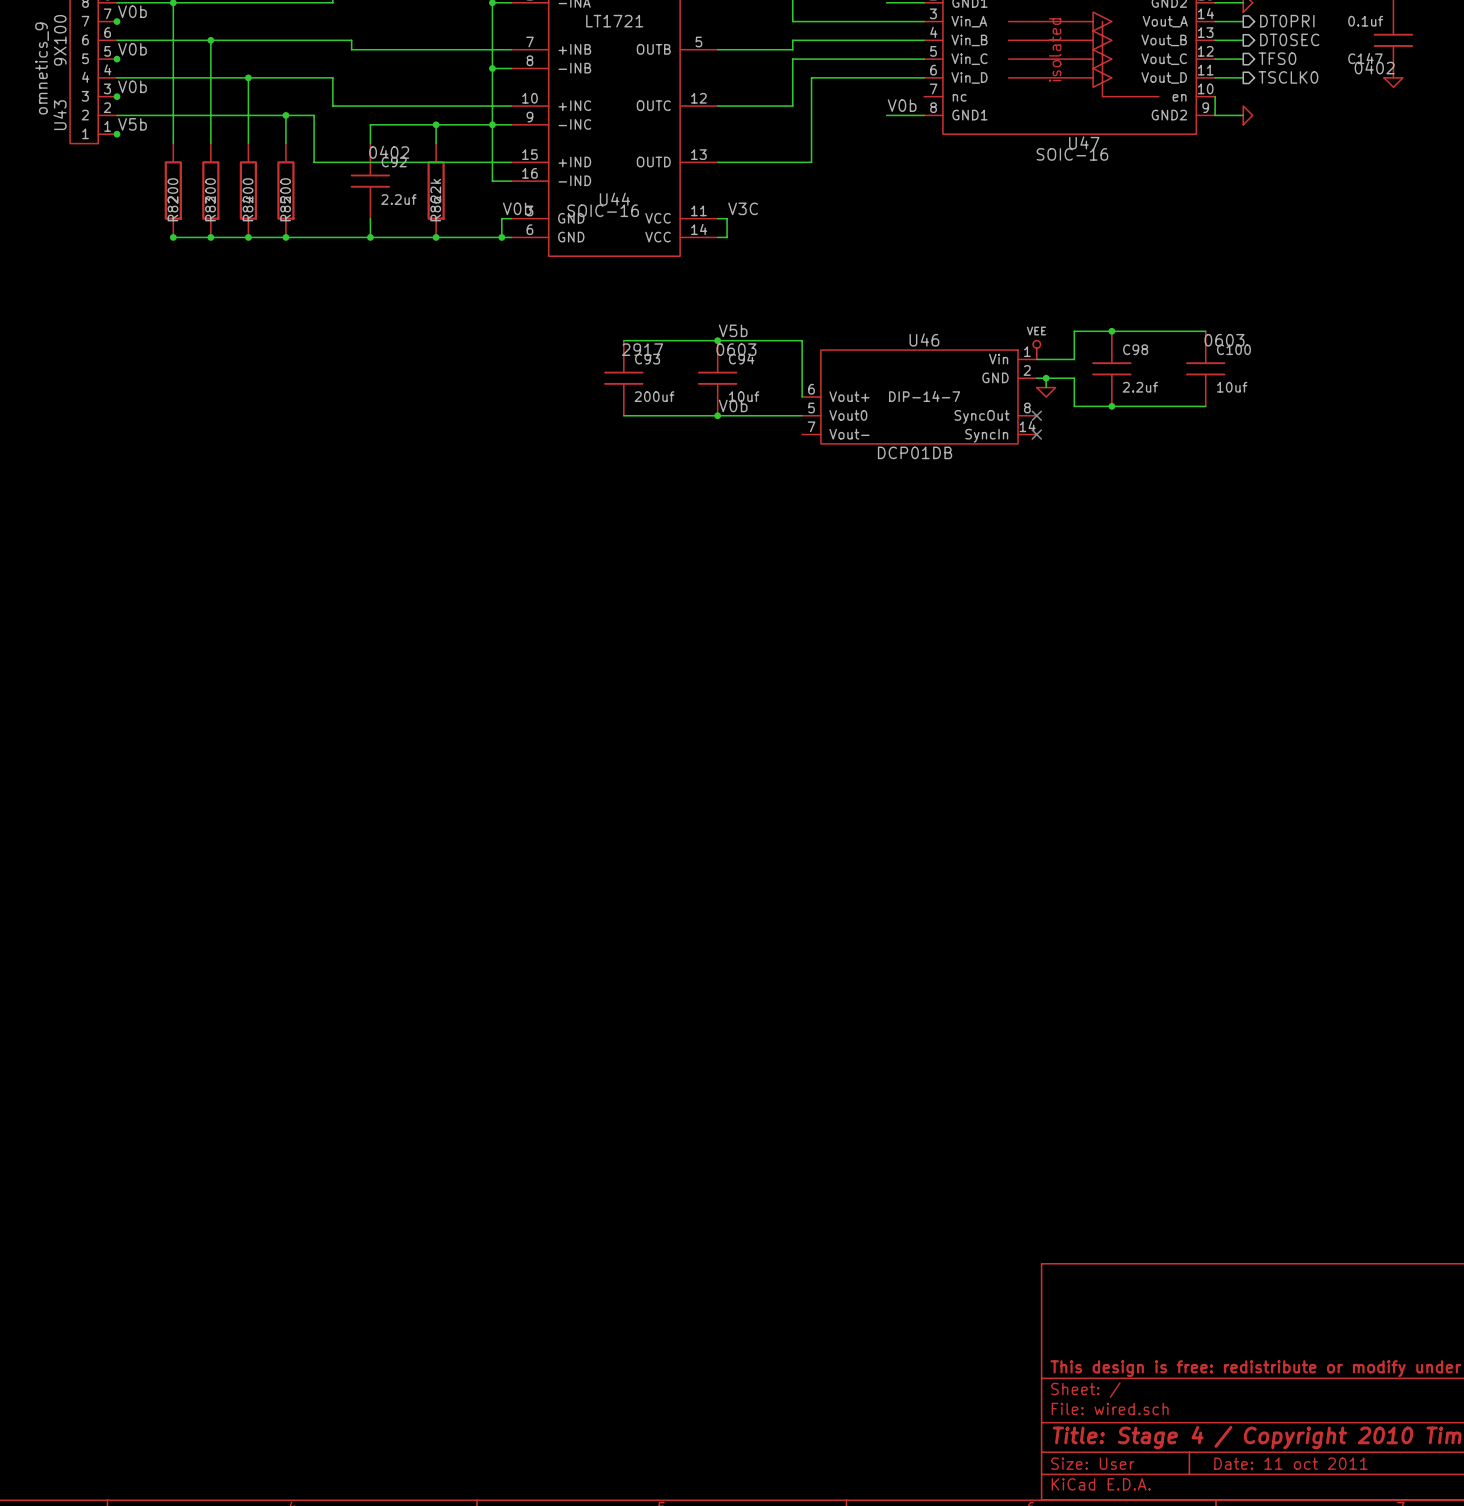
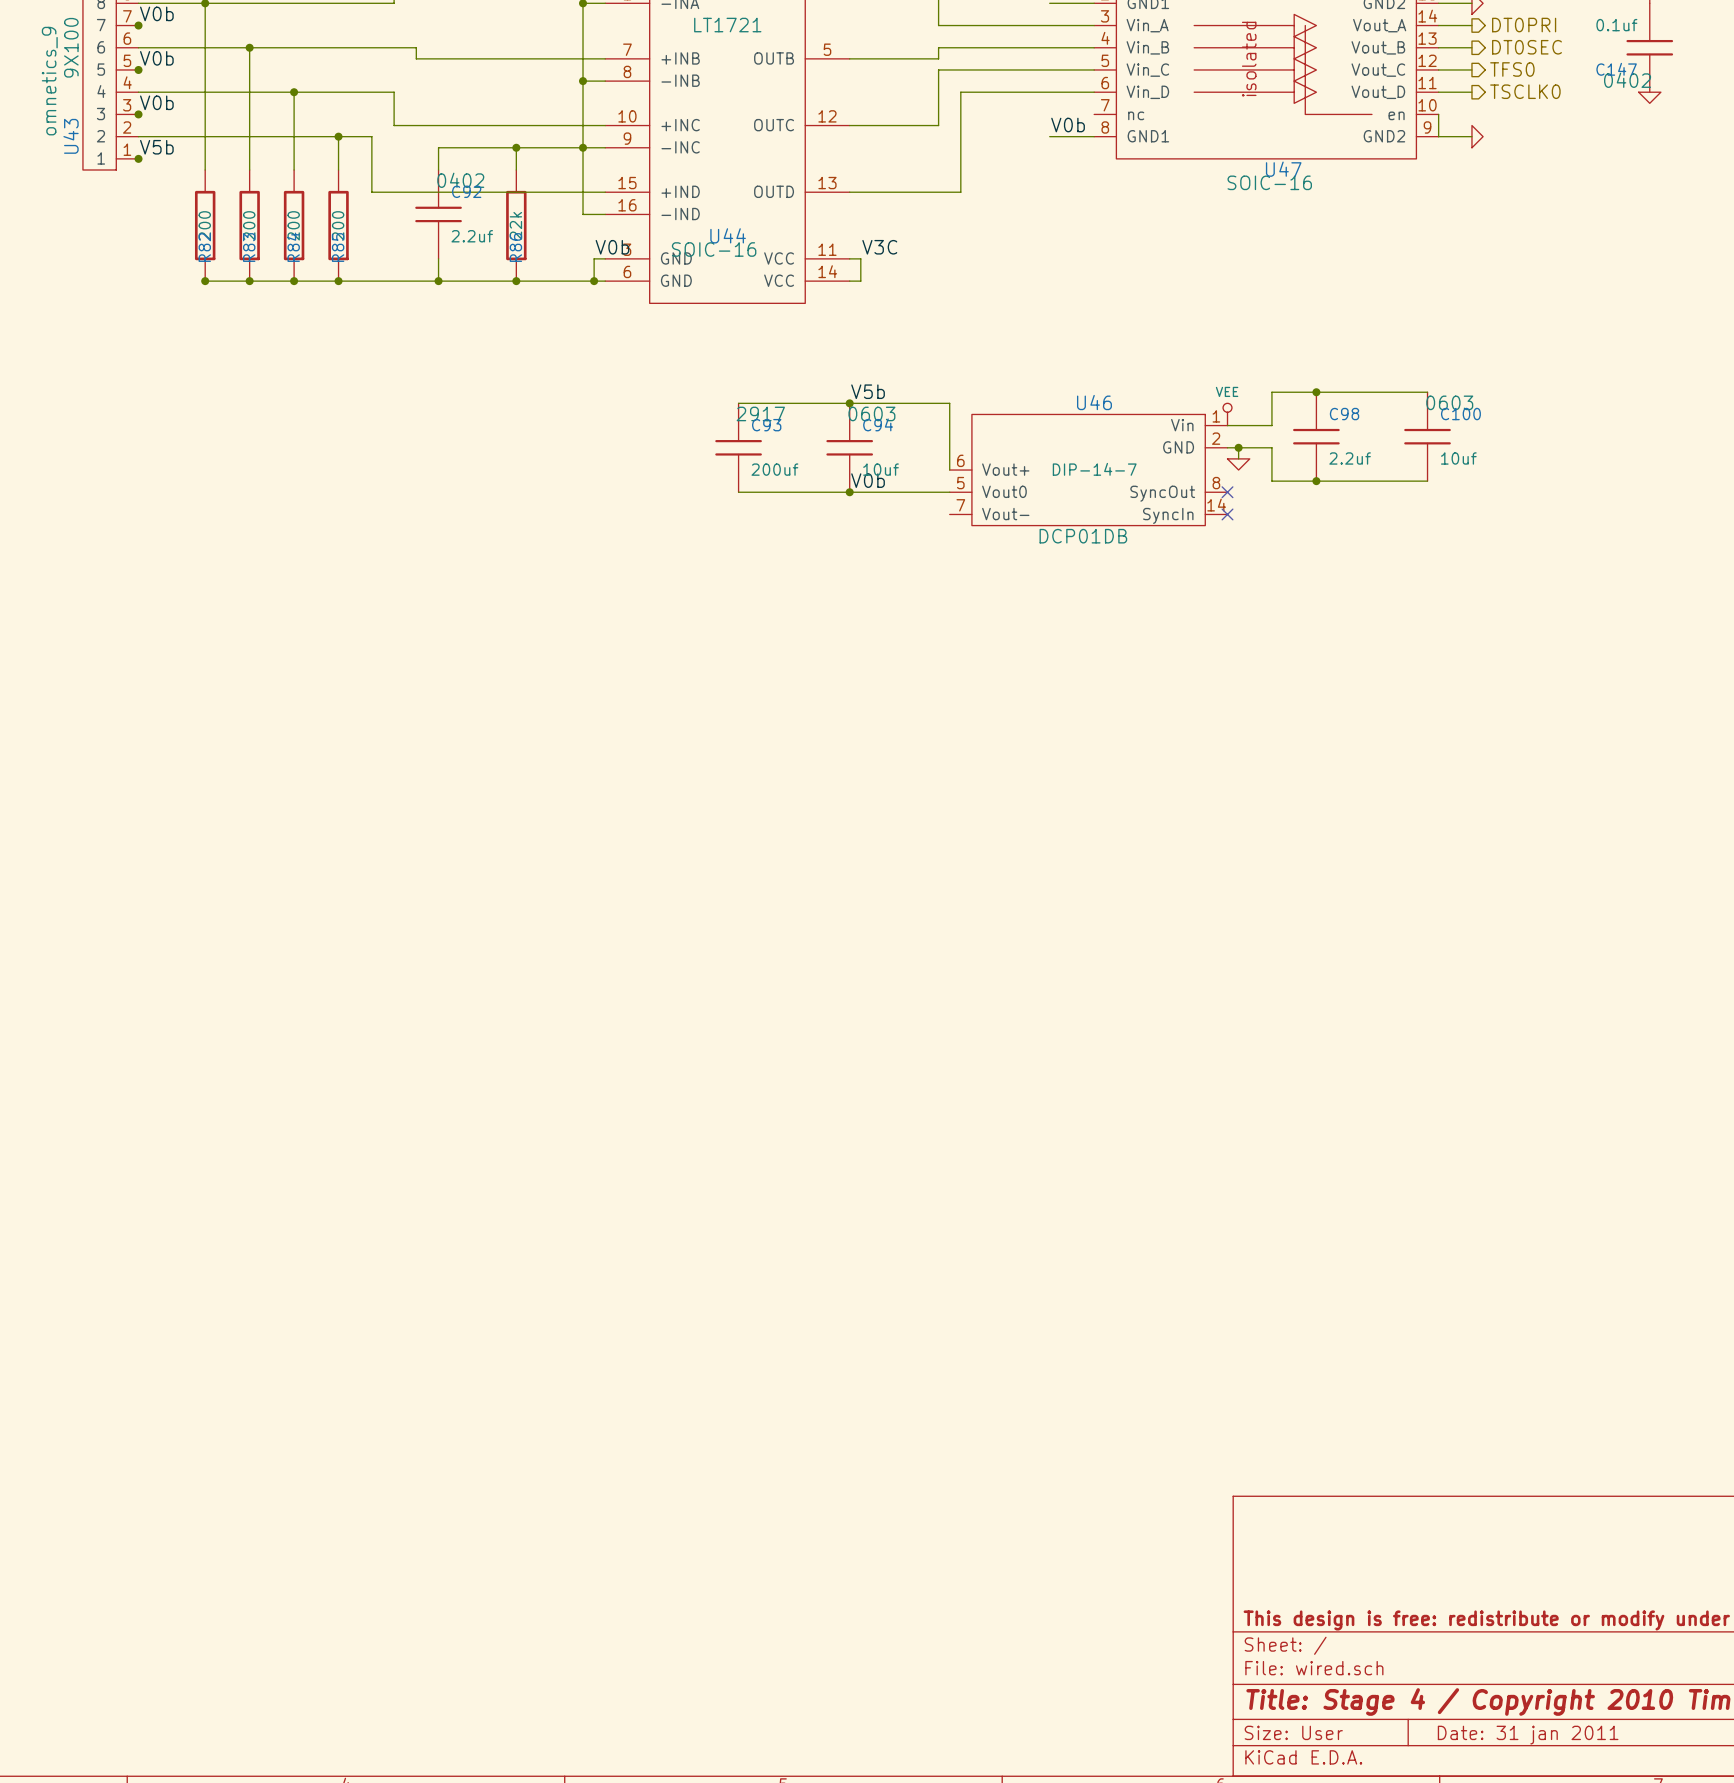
title block: Date: 11 oct 2011 (1290, 1463) -> Date: 31 jan 2011 (1528, 1735)

